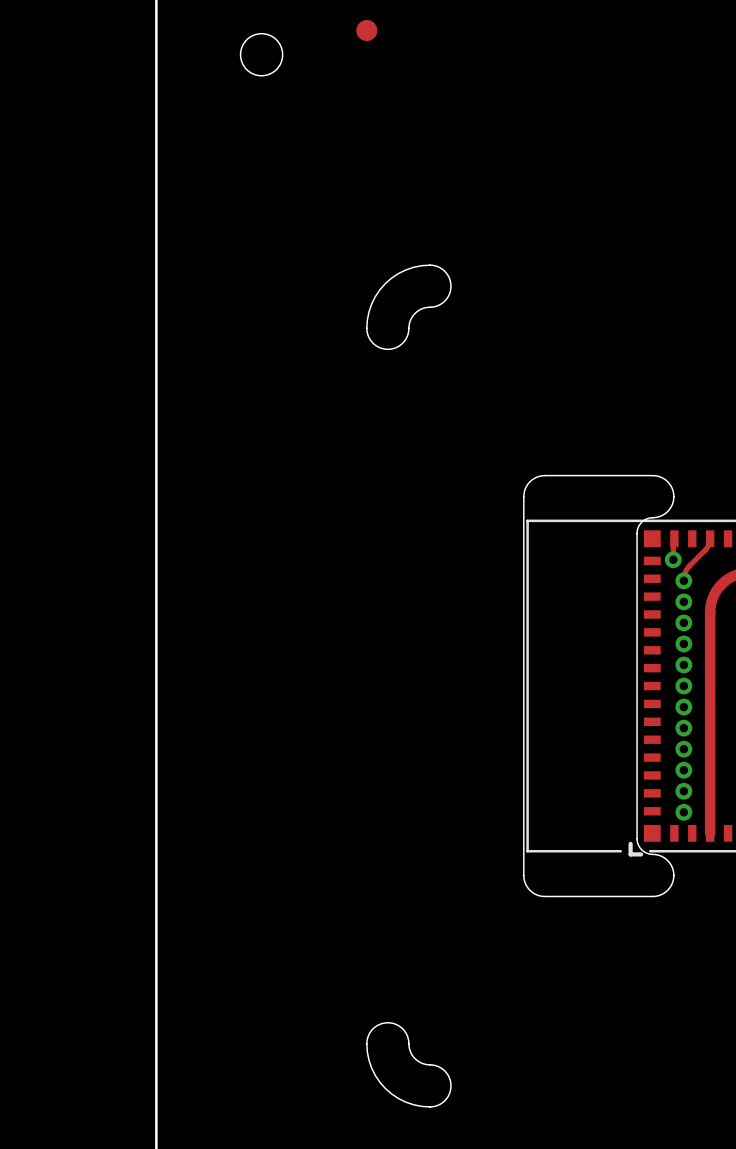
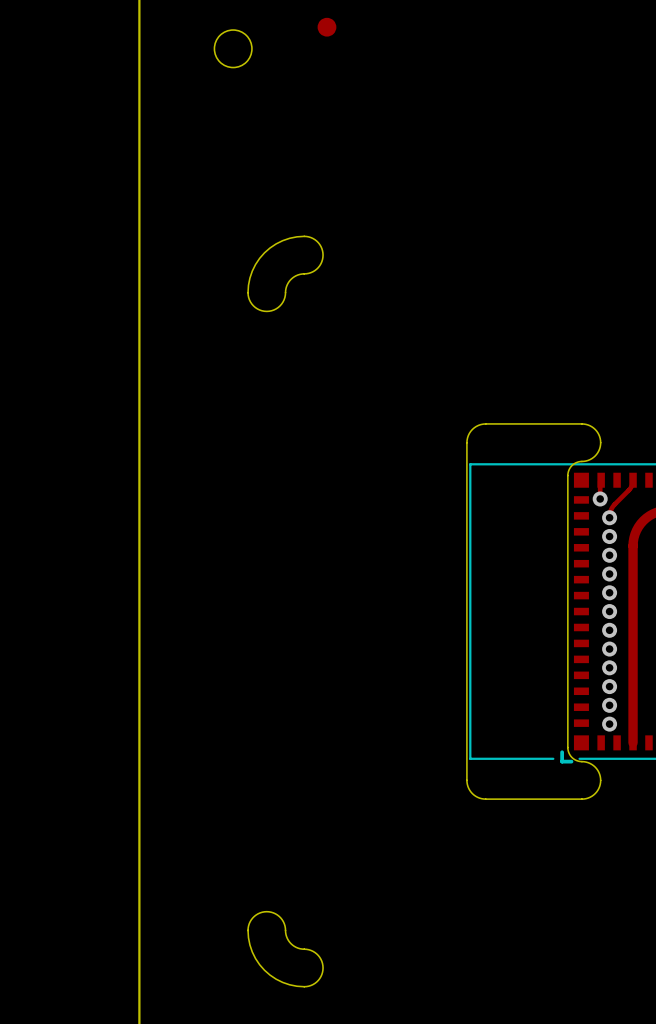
board edge: none -> (304, 236) (313, 238) (320, 246) (322, 257) (319, 265) (313, 271) (298, 274) (291, 279) (286, 286) (284, 299) (278, 307) (269, 311) (257, 308) (250, 302) (248, 292) (249, 278) (255, 264) (264, 252) (276, 243) (289, 238) (304, 236)
board edge: (429, 265) (440, 267) (448, 275) (451, 286) (448, 296) (440, 304) (423, 308) (415, 313) (410, 321) (407, 336) (400, 344) (387, 349) (377, 346) (369, 338) (366, 328) (368, 311) (375, 296) (385, 283) (398, 273) (413, 267) (429, 265) -> none
board edge: none -> (248, 930) (251, 919) (258, 913) (266, 911) (277, 915) (283, 921) (286, 936) (291, 943) (298, 948) (313, 951) (319, 957) (323, 967) (319, 978) (310, 985) (296, 986) (282, 982) (270, 975) (259, 964) (252, 951) (248, 930)
board edge: (366, 1043) (369, 1033) (377, 1025) (387, 1022) (398, 1025) (406, 1033) (410, 1050) (415, 1058) (423, 1063) (438, 1066) (446, 1073) (451, 1085) (448, 1096) (440, 1104) (429, 1106) (413, 1104) (398, 1098) (385, 1088) (375, 1075) (368, 1060) (366, 1043) -> none

